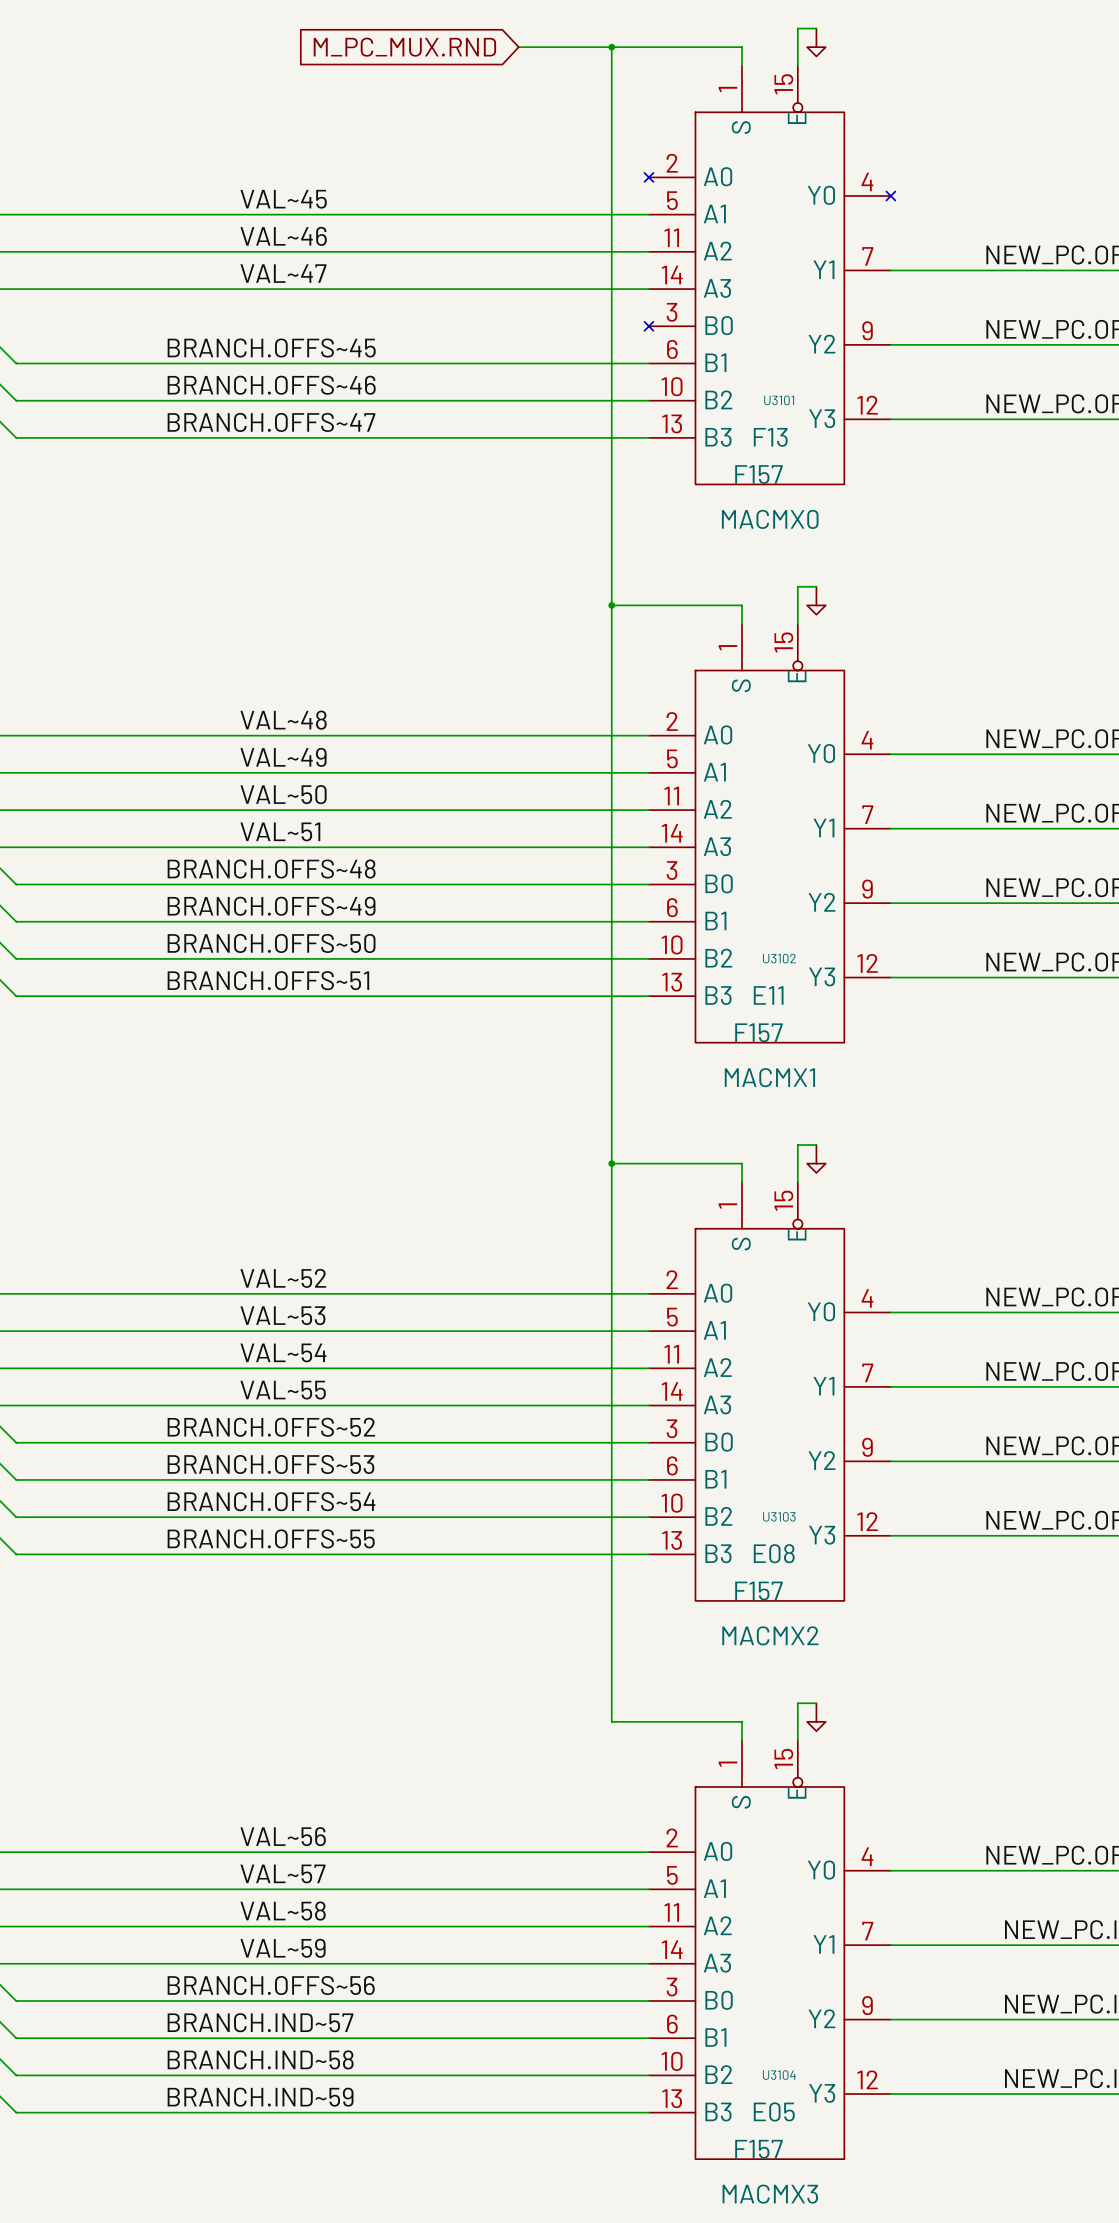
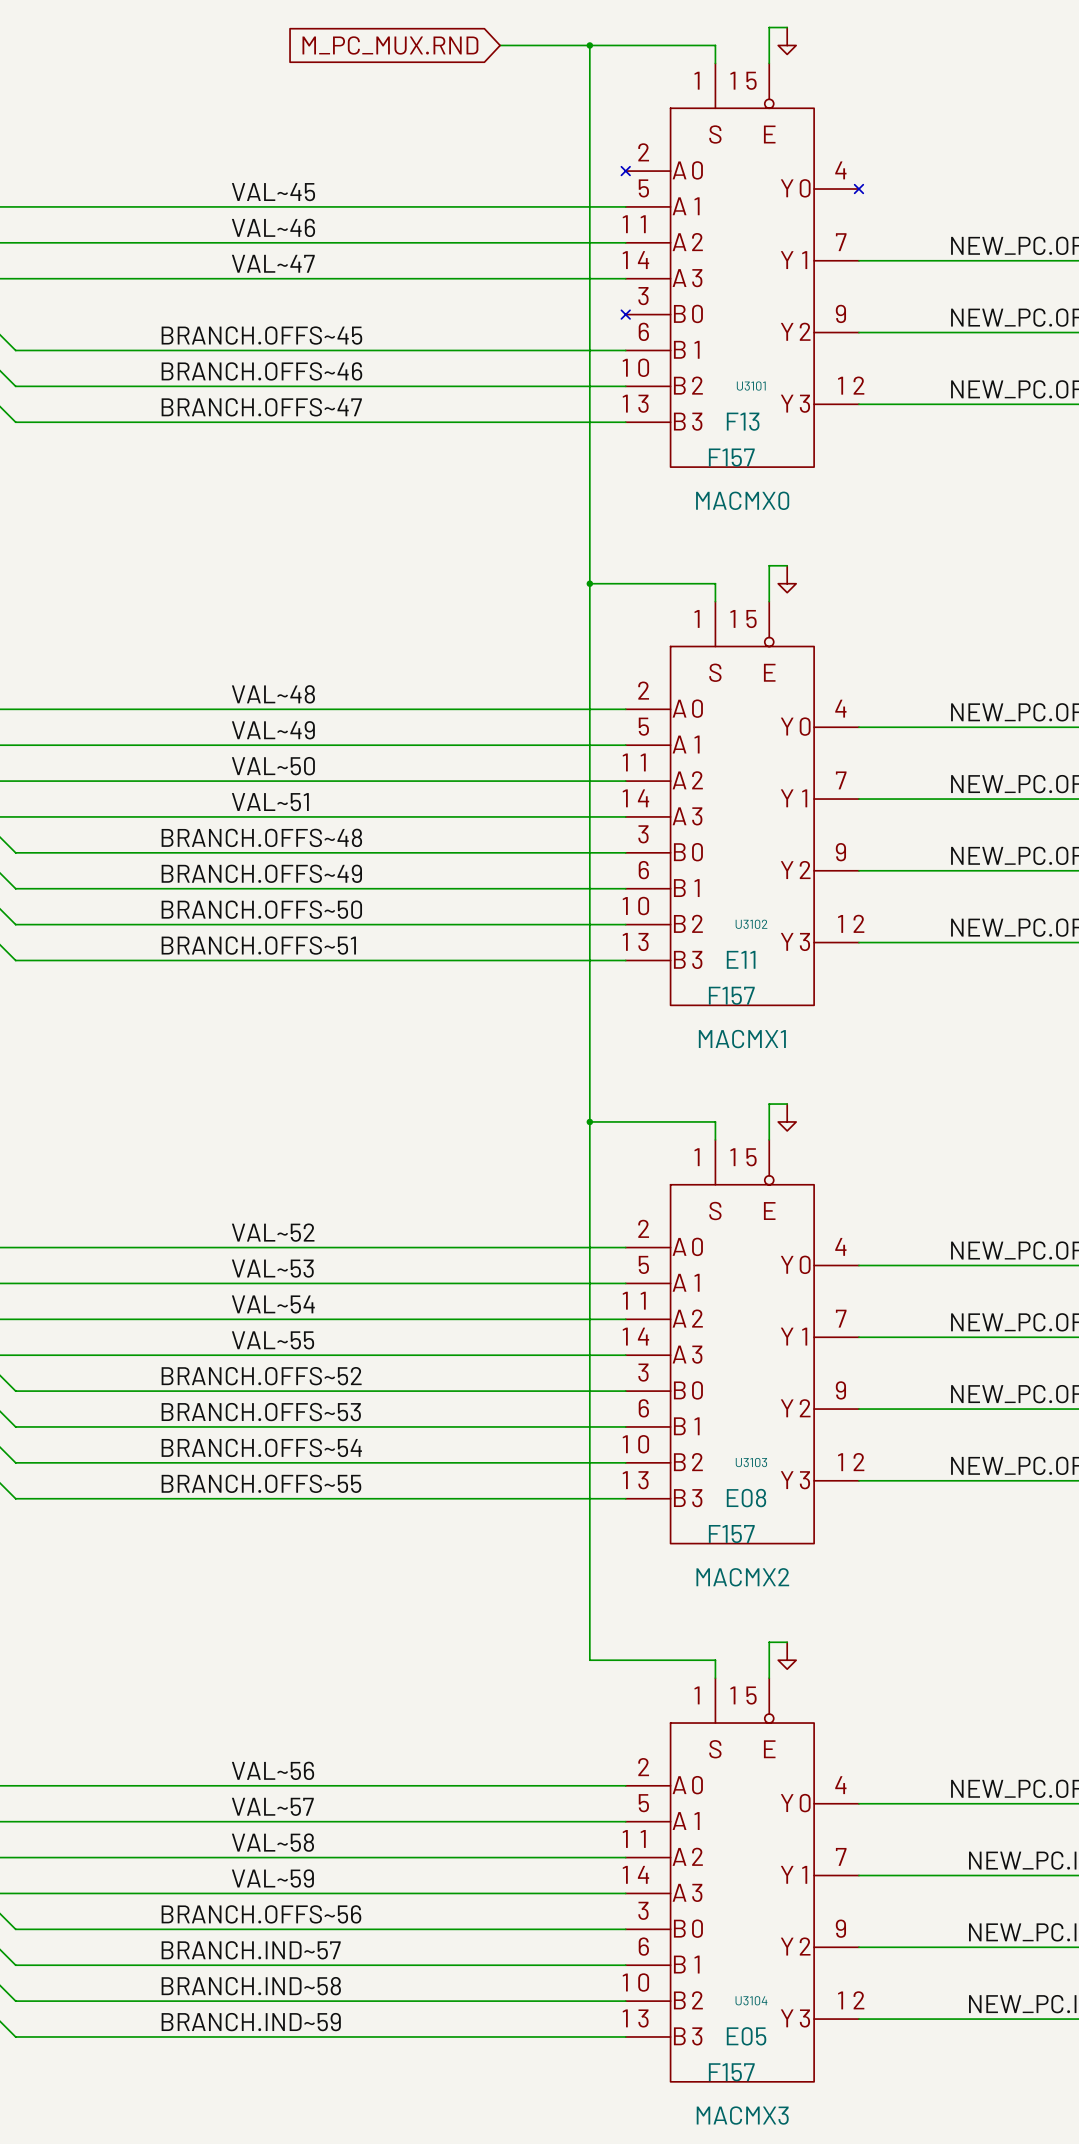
U3101 symbol: [648, 65, 891, 485] -> [625, 63, 859, 468]
U3102 symbol: [648, 624, 891, 1043] -> [625, 601, 859, 1006]
U3103 symbol: [648, 1182, 891, 1601] -> [625, 1139, 859, 1544]
U3104 symbol: [648, 1740, 891, 2160] -> [625, 1678, 859, 2082]

